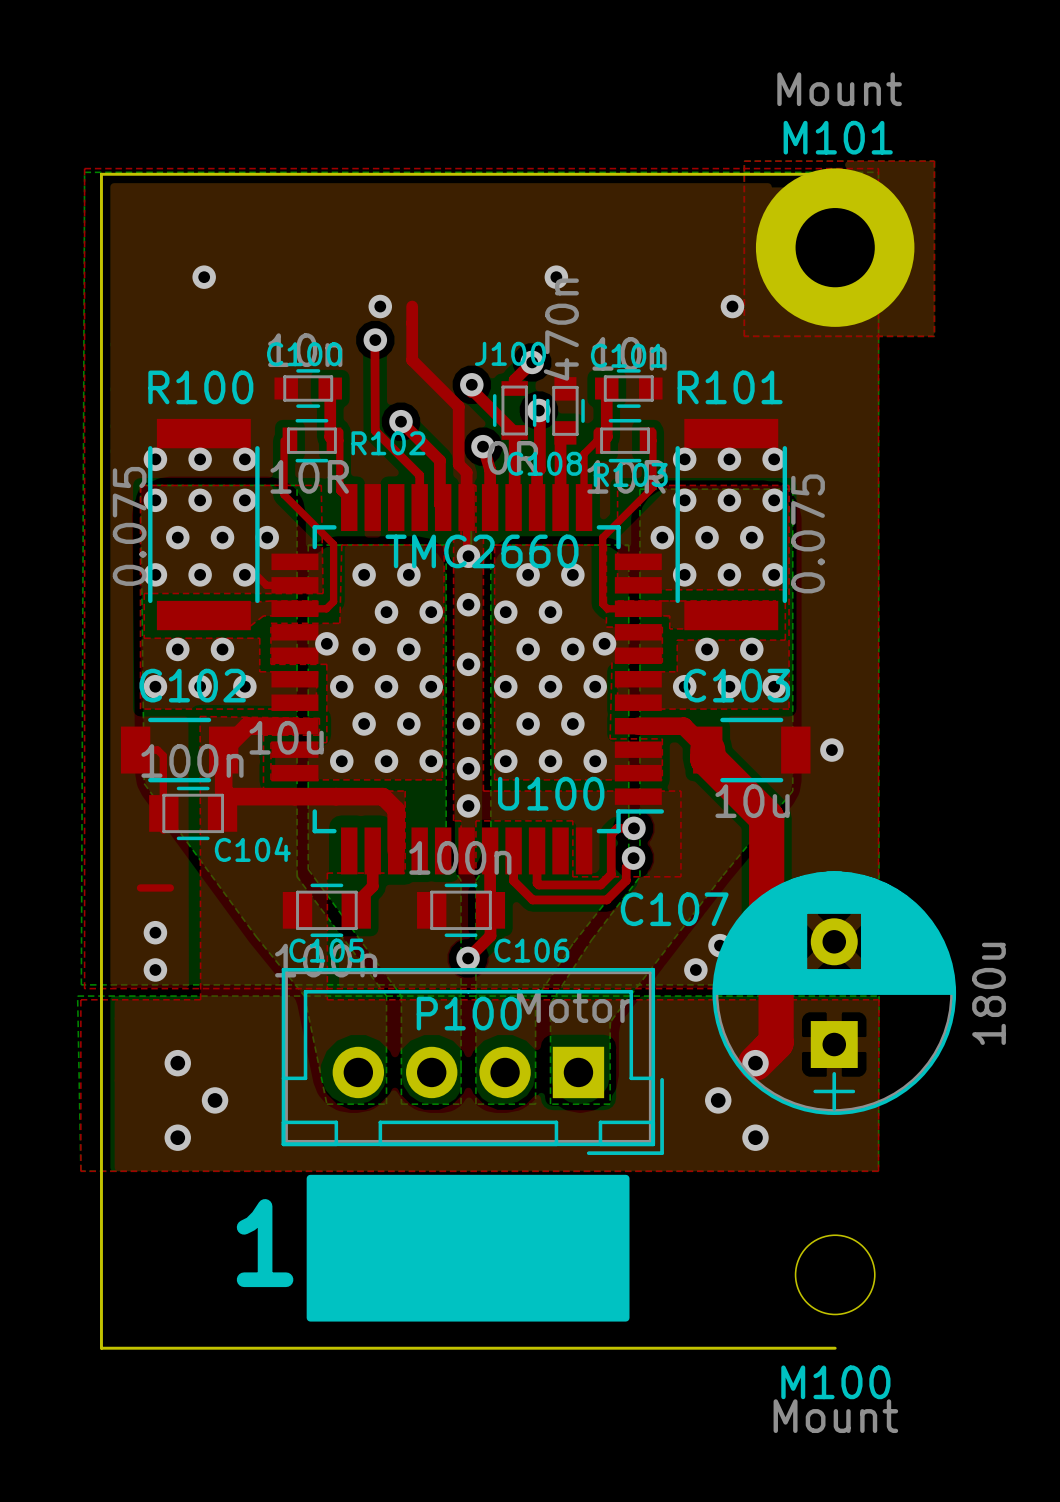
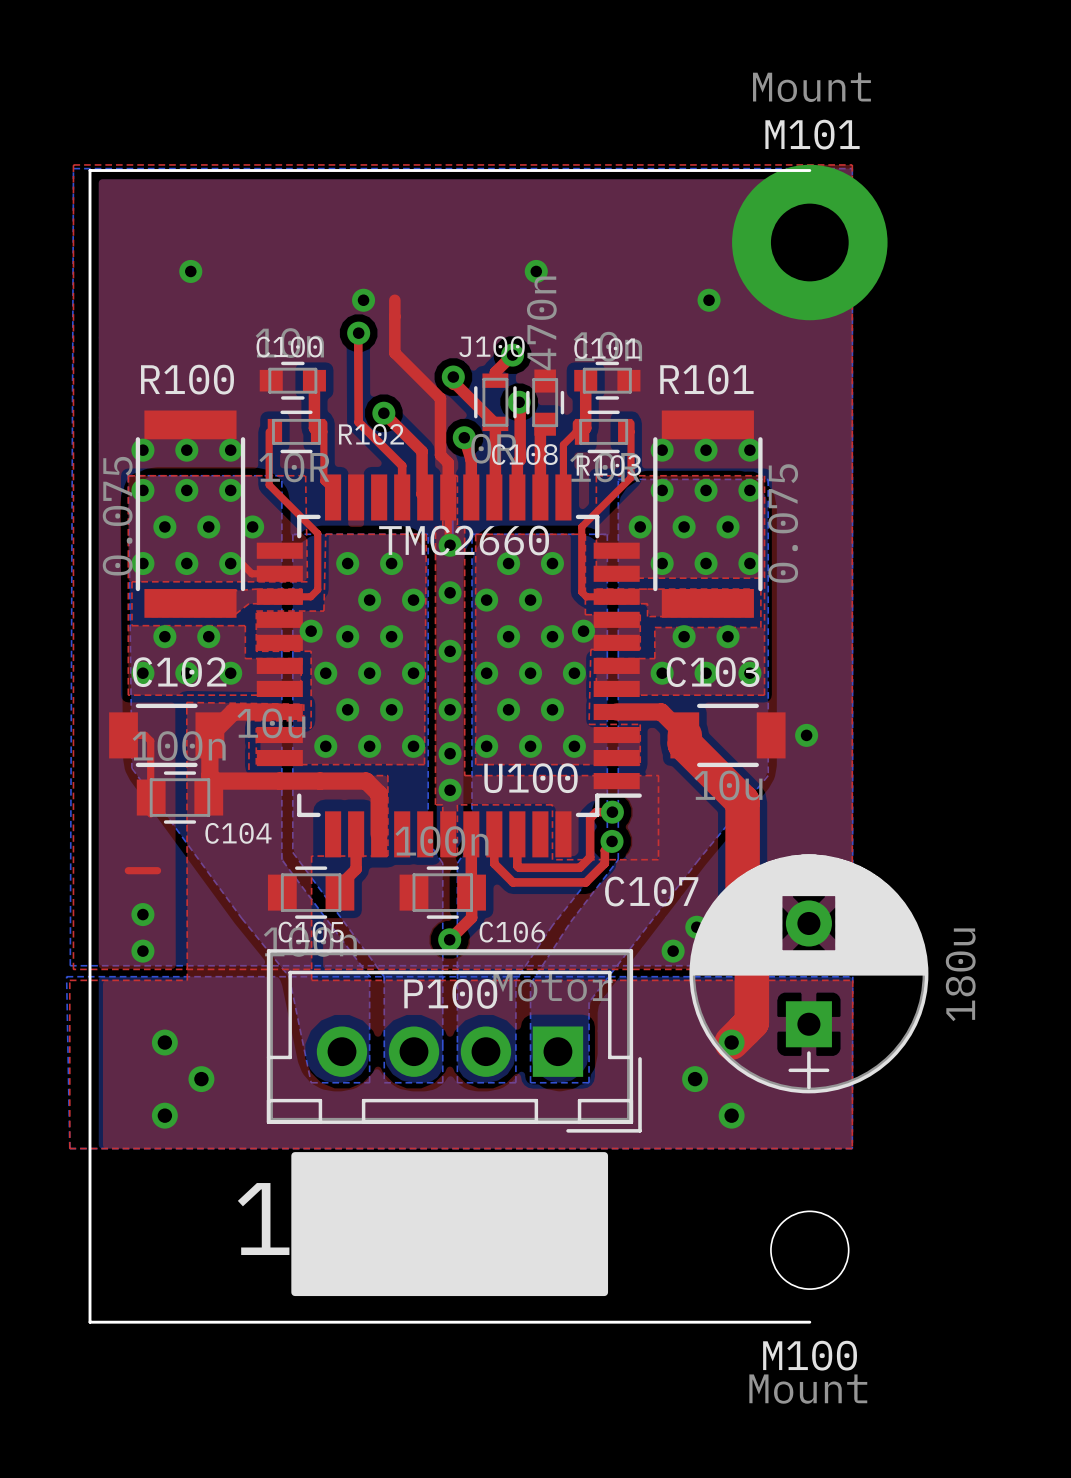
top zone outline: (744, 161) (934, 161) (934, 336) (744, 336) (744, 161) -> none

